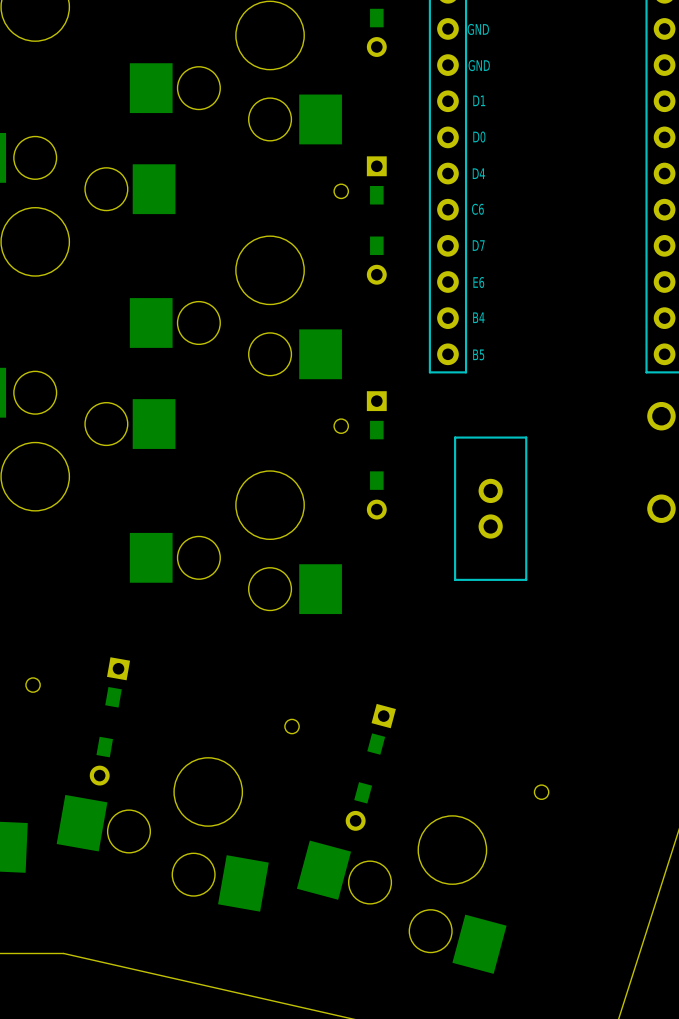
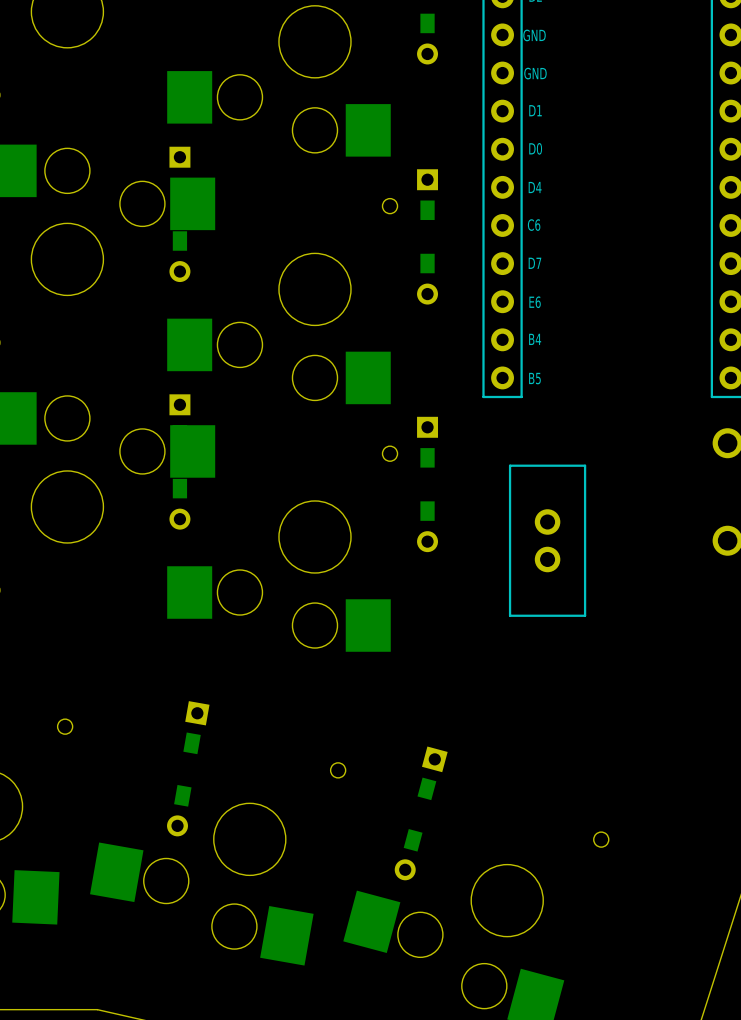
part: none -> (179, 214)
part: none -> (179, 461)
part position: (109, 721) -> (188, 768)

